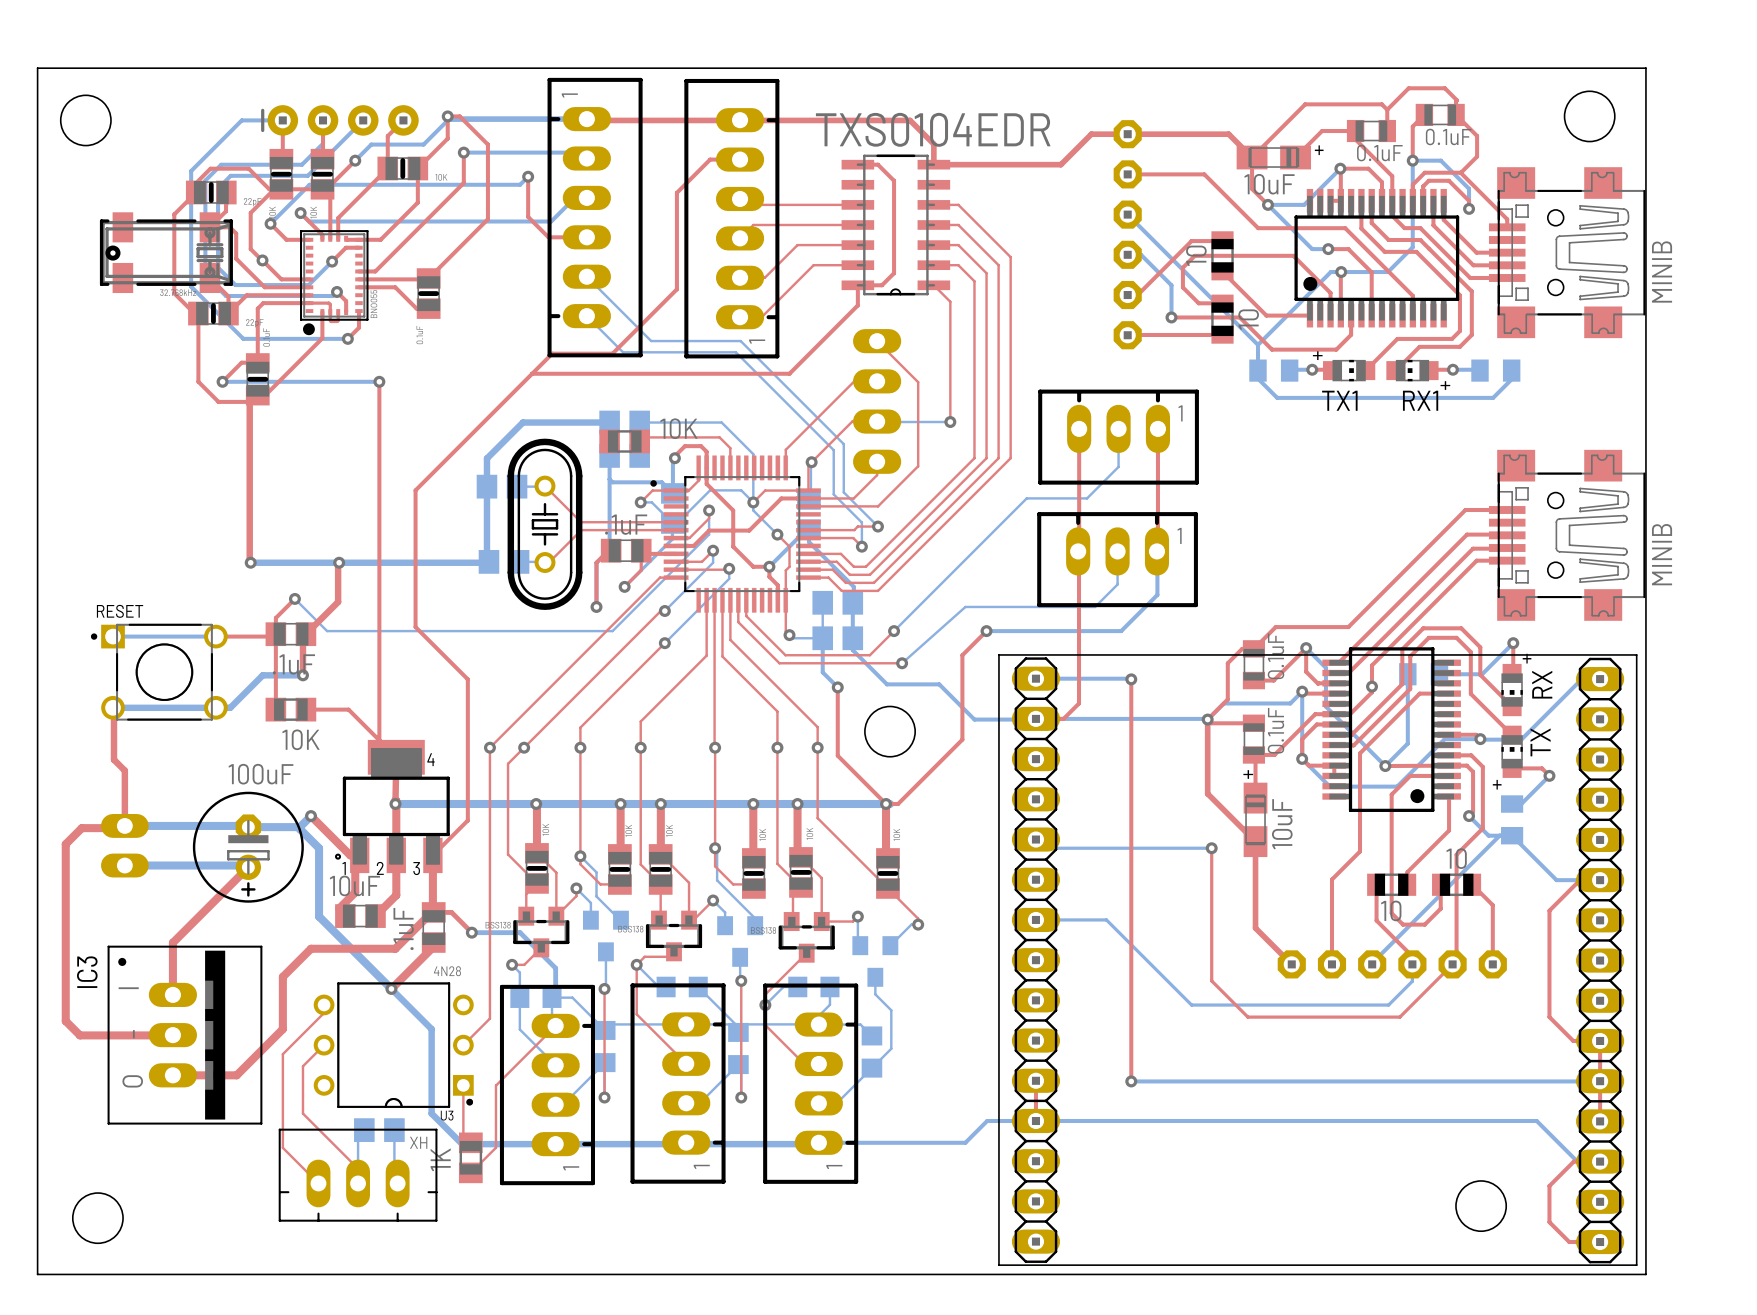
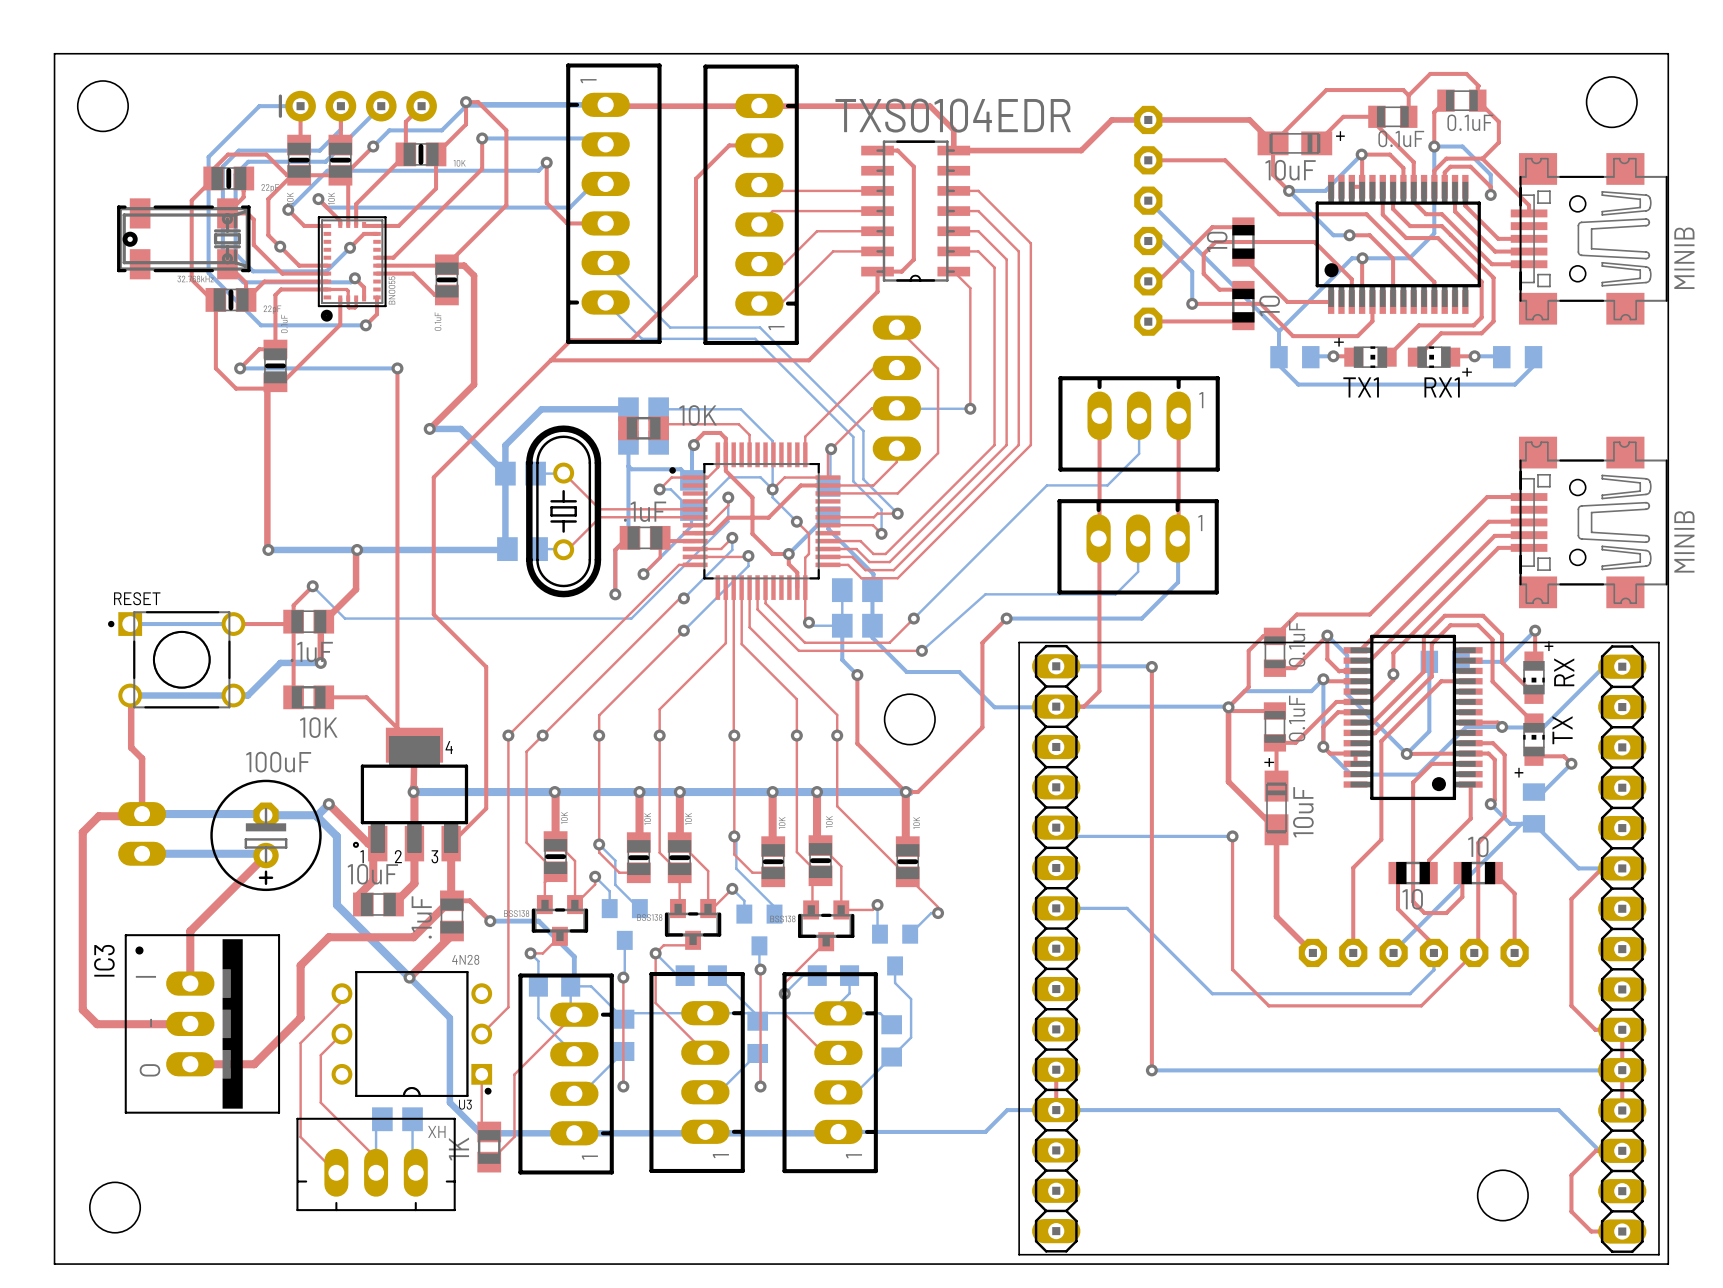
top track: none -> (446, 265) (464, 265) (474, 275) (474, 384) (429, 428)
bottom track: none -> (429, 428) (460, 428) (505, 473)
via: none -> (429, 428)

